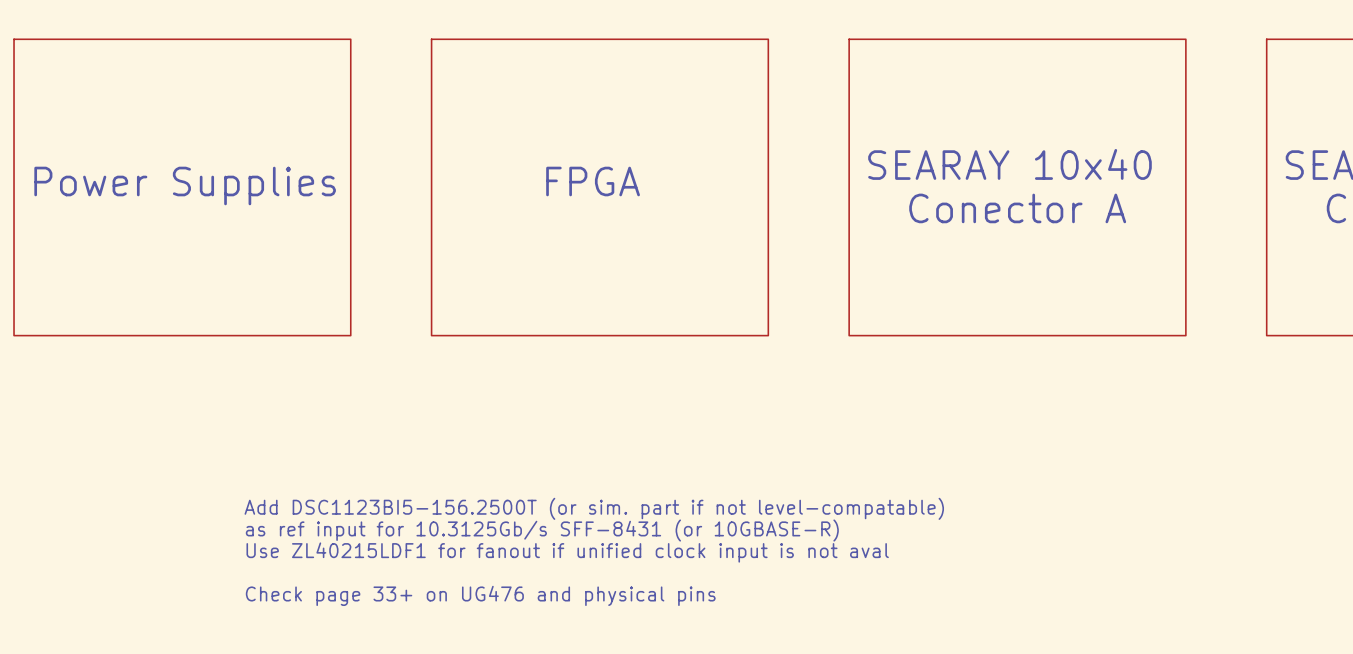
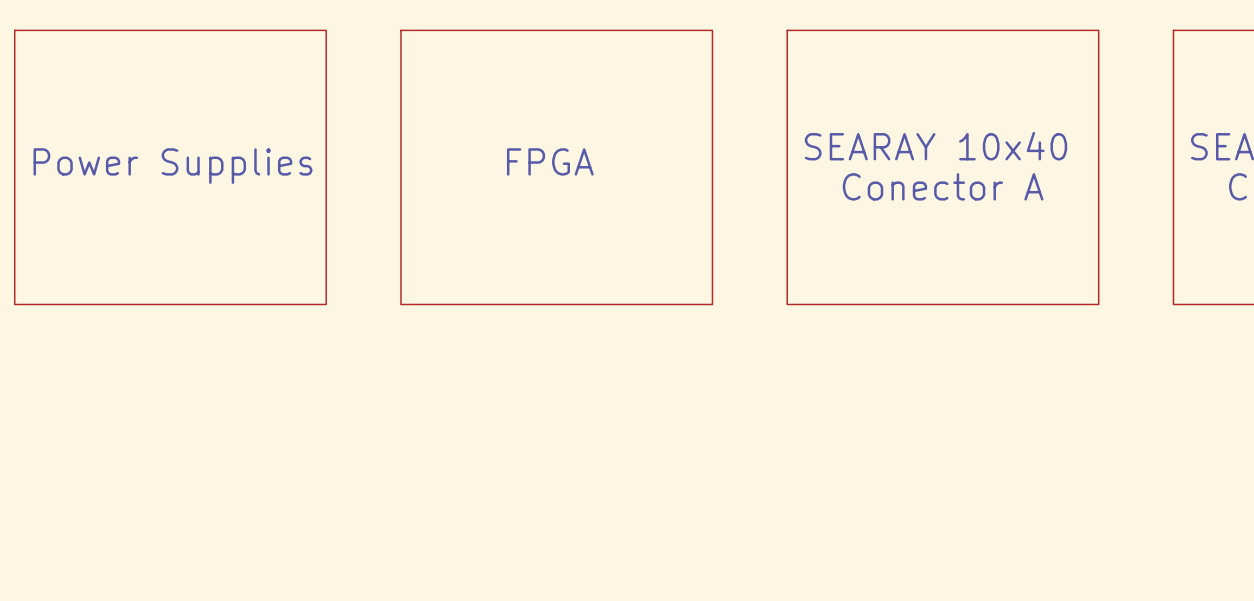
text: Add DSC1123BI5-156.2500T (or sim. part if not level-compatable) (594, 508) -> none
text: as ref input for 10.3125Gb/s SFF-8431 (or 10GBASE-R) (542, 530) -> none
text: Use ZL40215LDF1 for fanout if unified clock input is not aval (567, 552) -> none
text: Check page 33+ on UG476 and physical pins (480, 595) -> none

